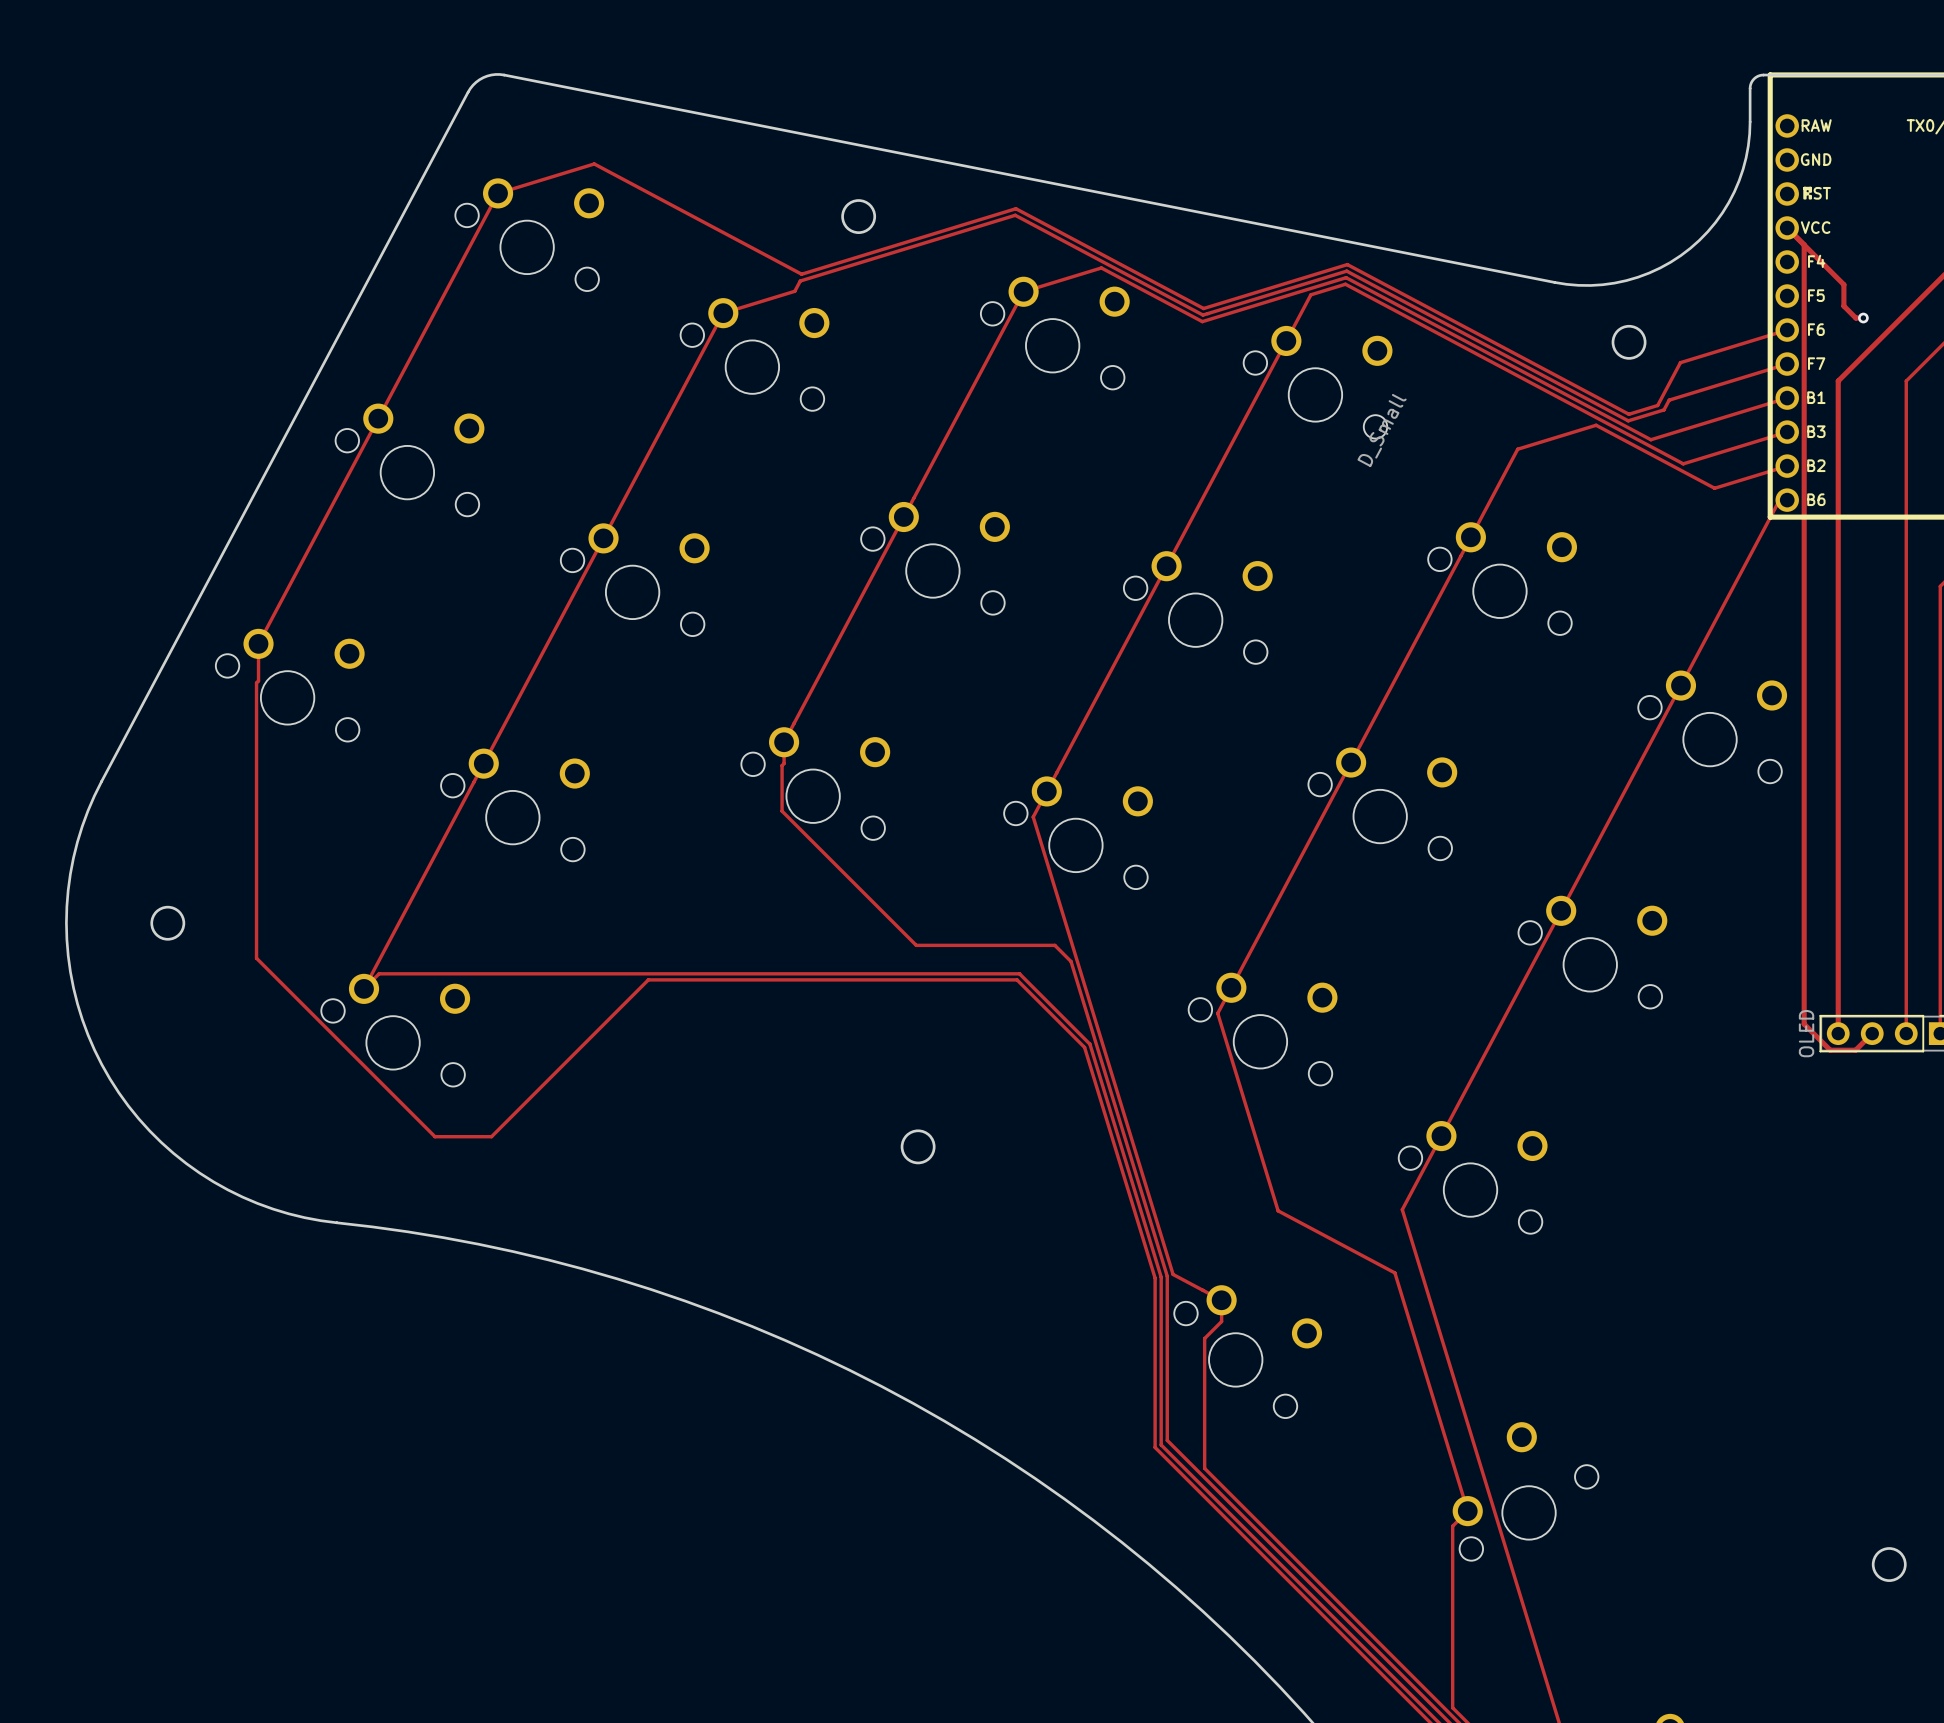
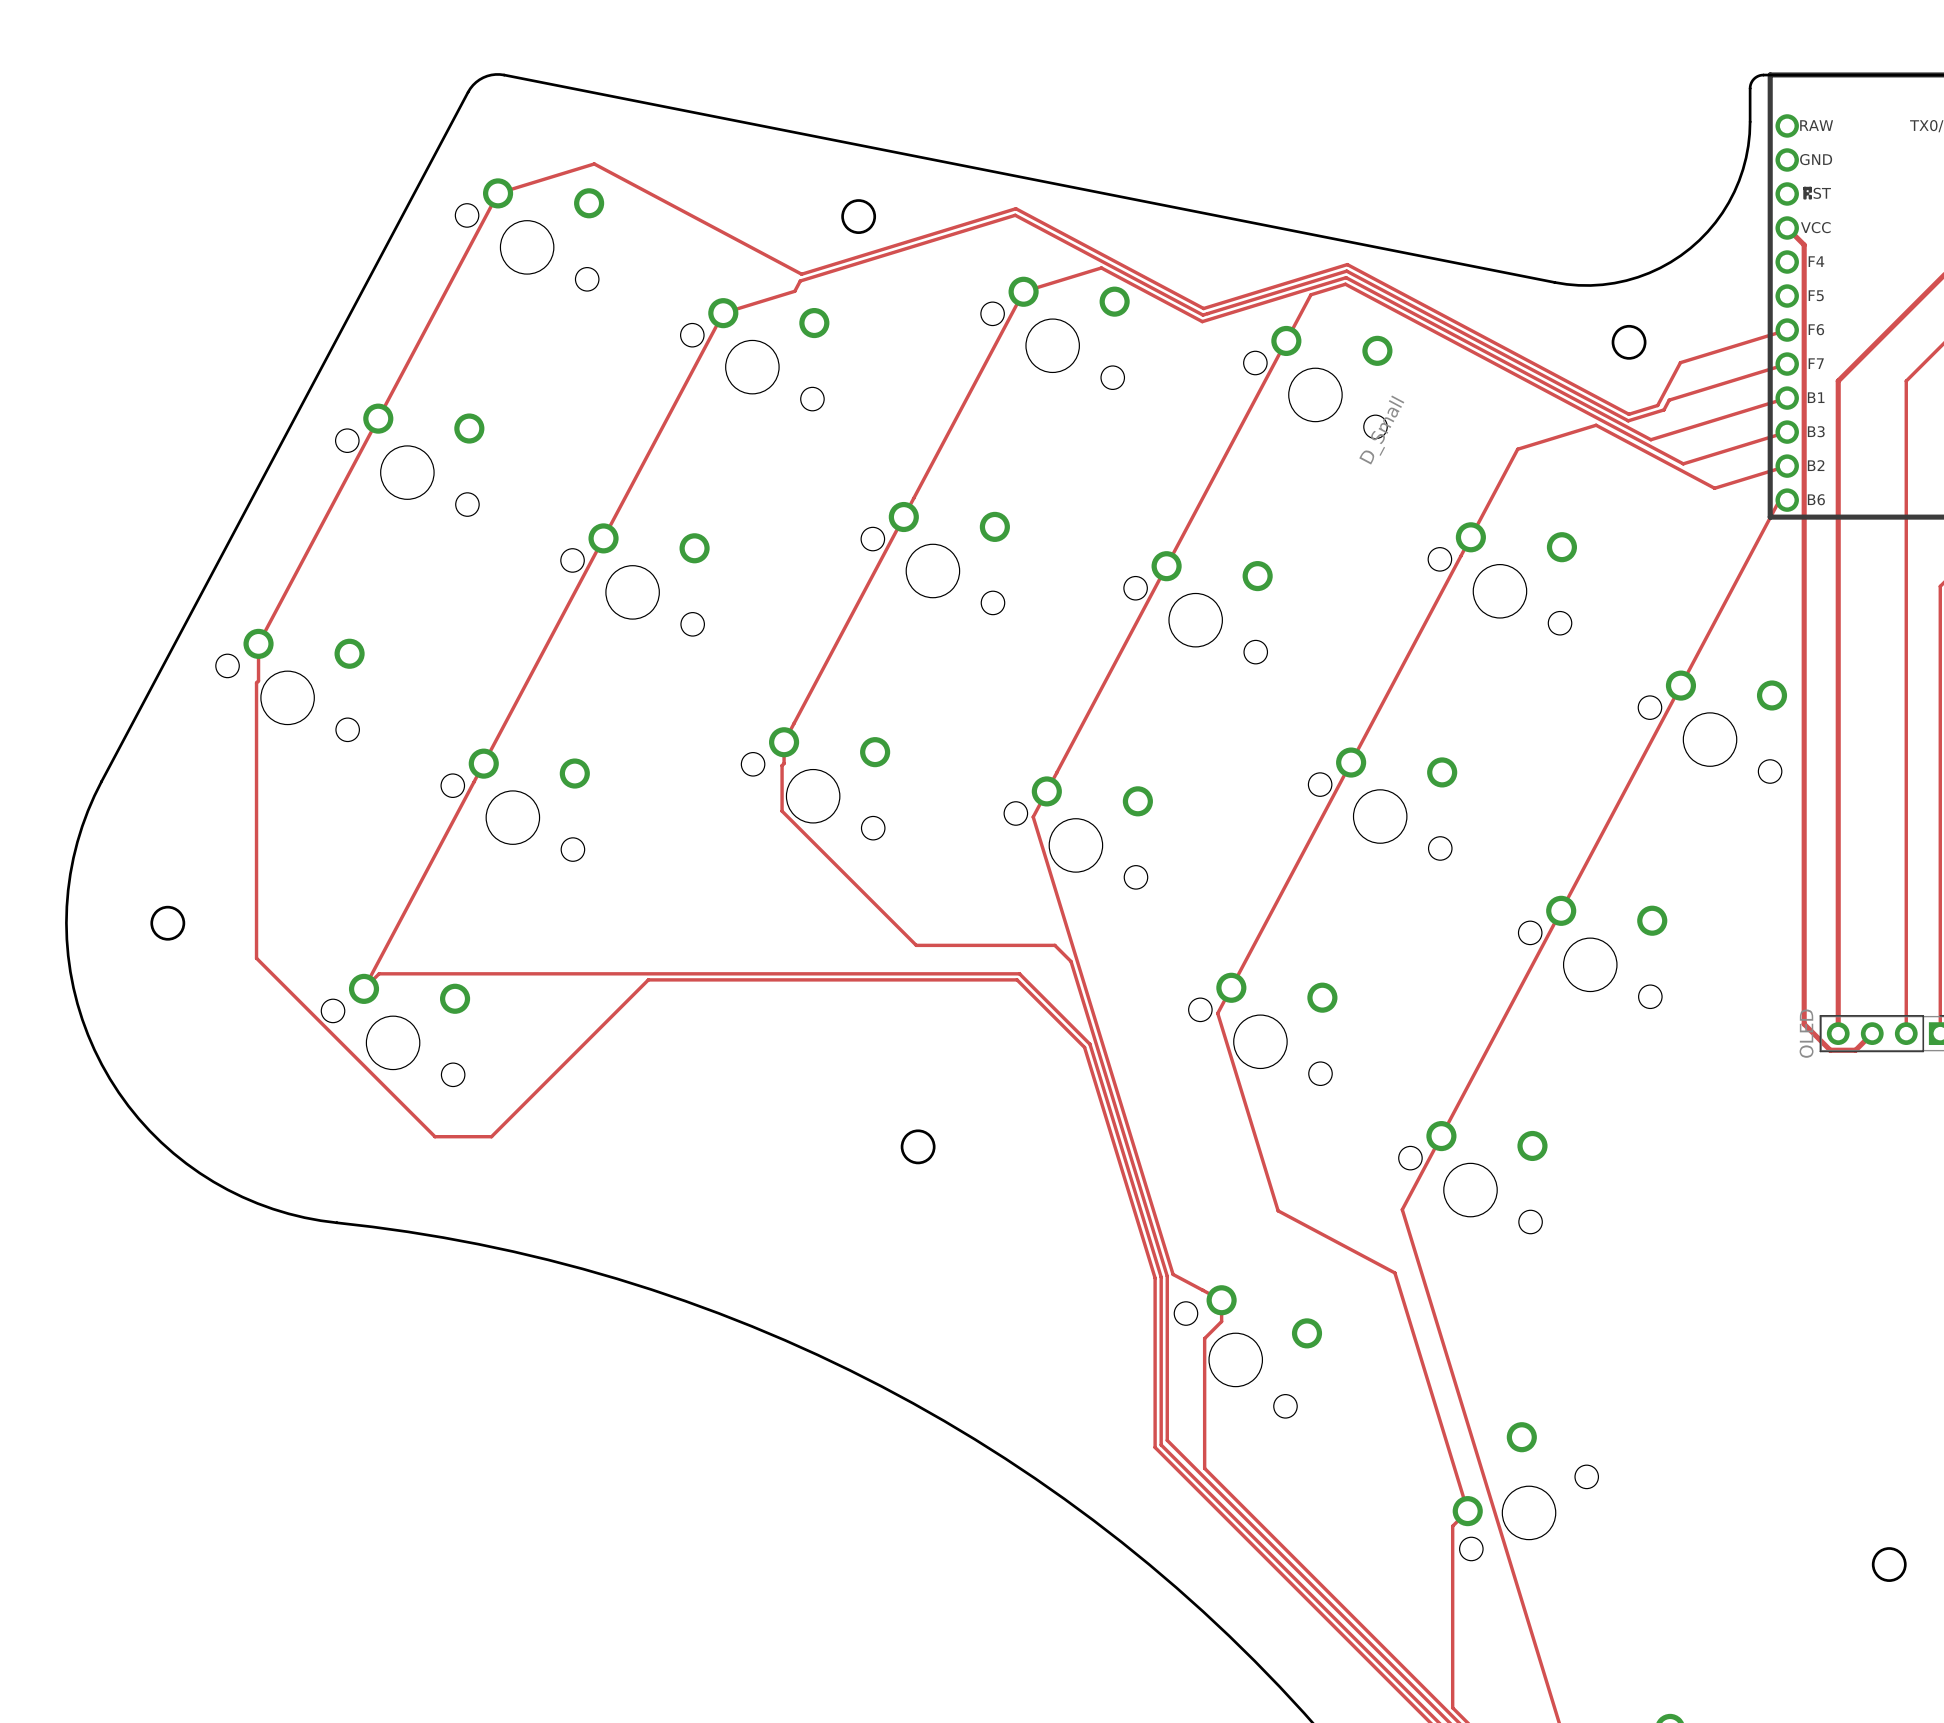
track: (1804, 244) (1843, 284) (1843, 306) (1855, 318) (1863, 318) -> none
via: (1863, 318) -> none

